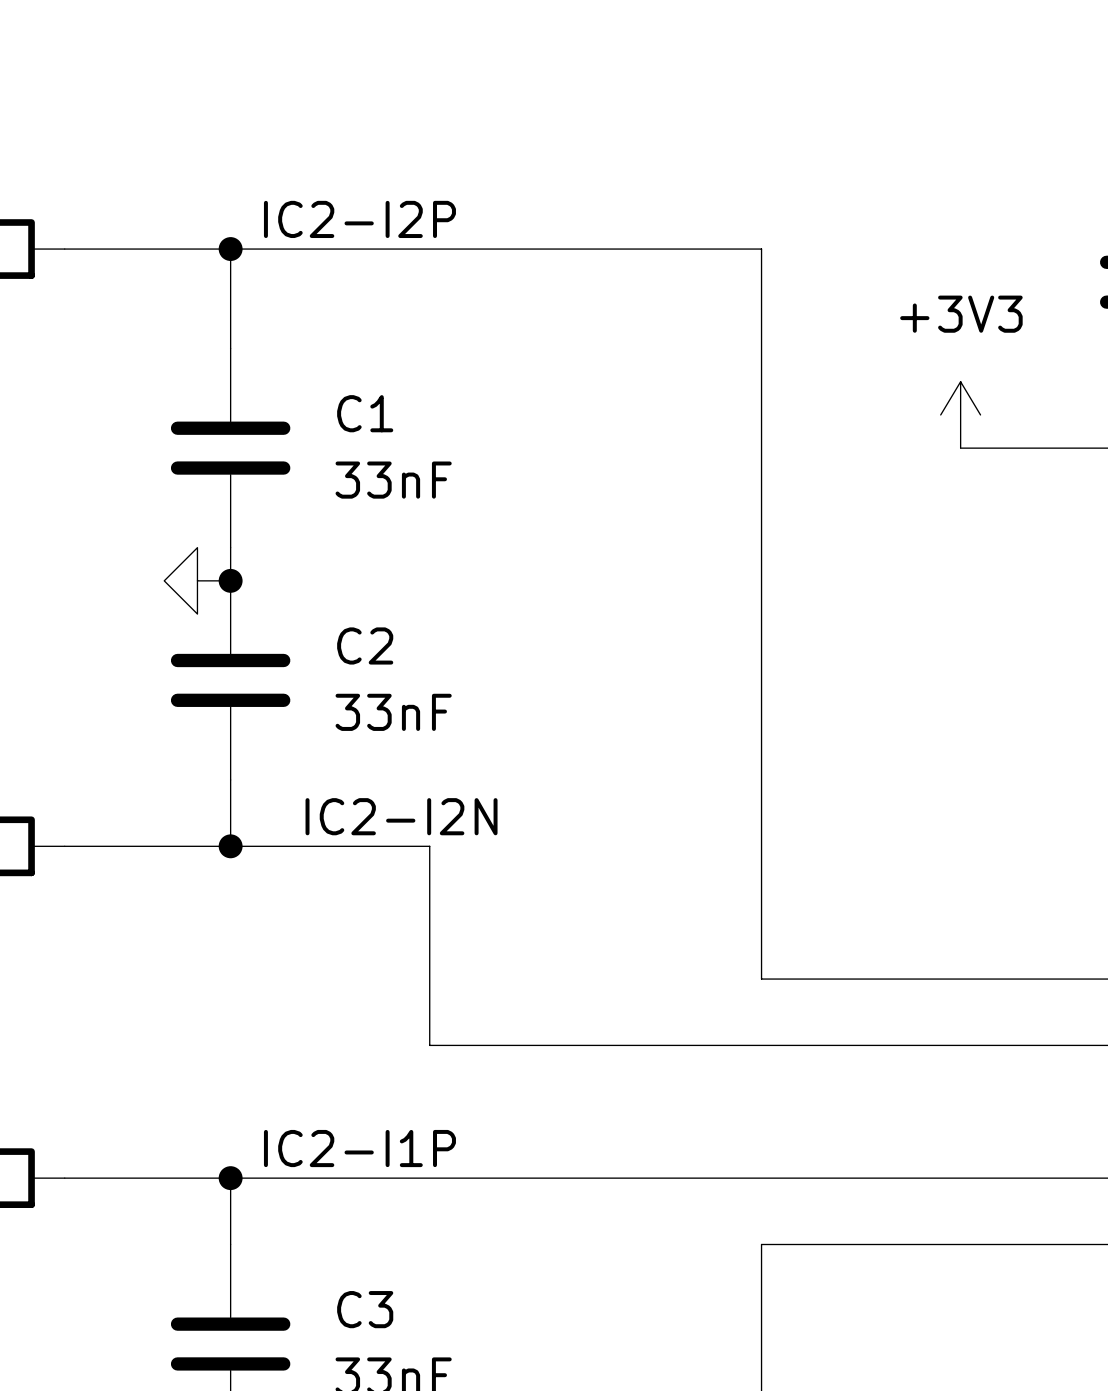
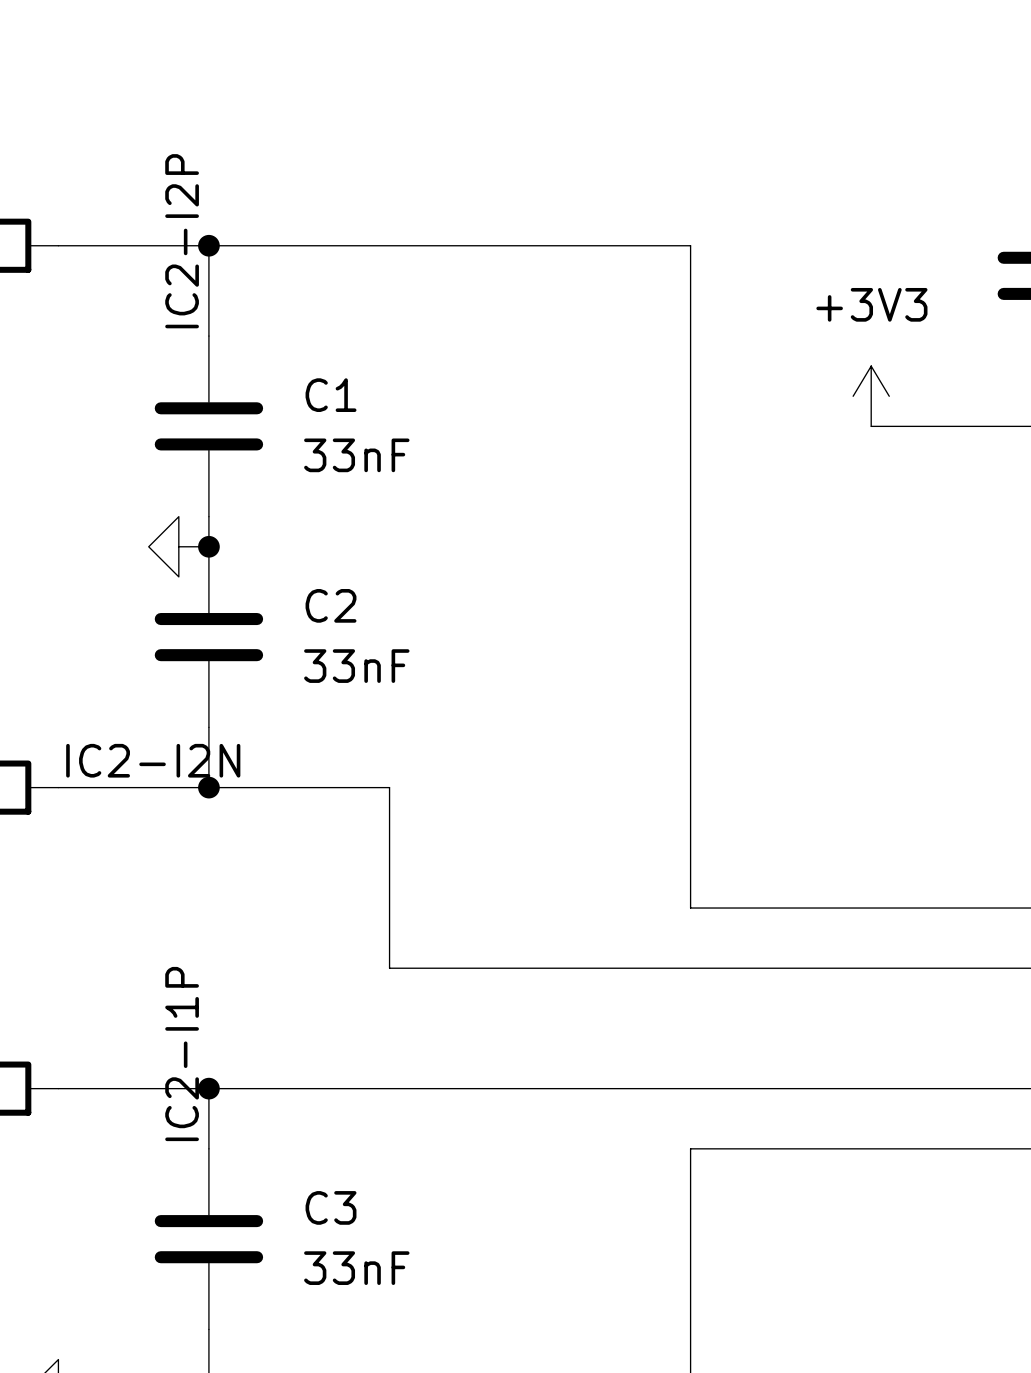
label rotation: 0° (359, 219) -> 90° counterclockwise (182, 241)
label position: IC2-I2N (401, 816) -> IC2-I2N (153, 760)
label rotation: 0° (359, 1148) -> 90° counterclockwise (182, 1054)

